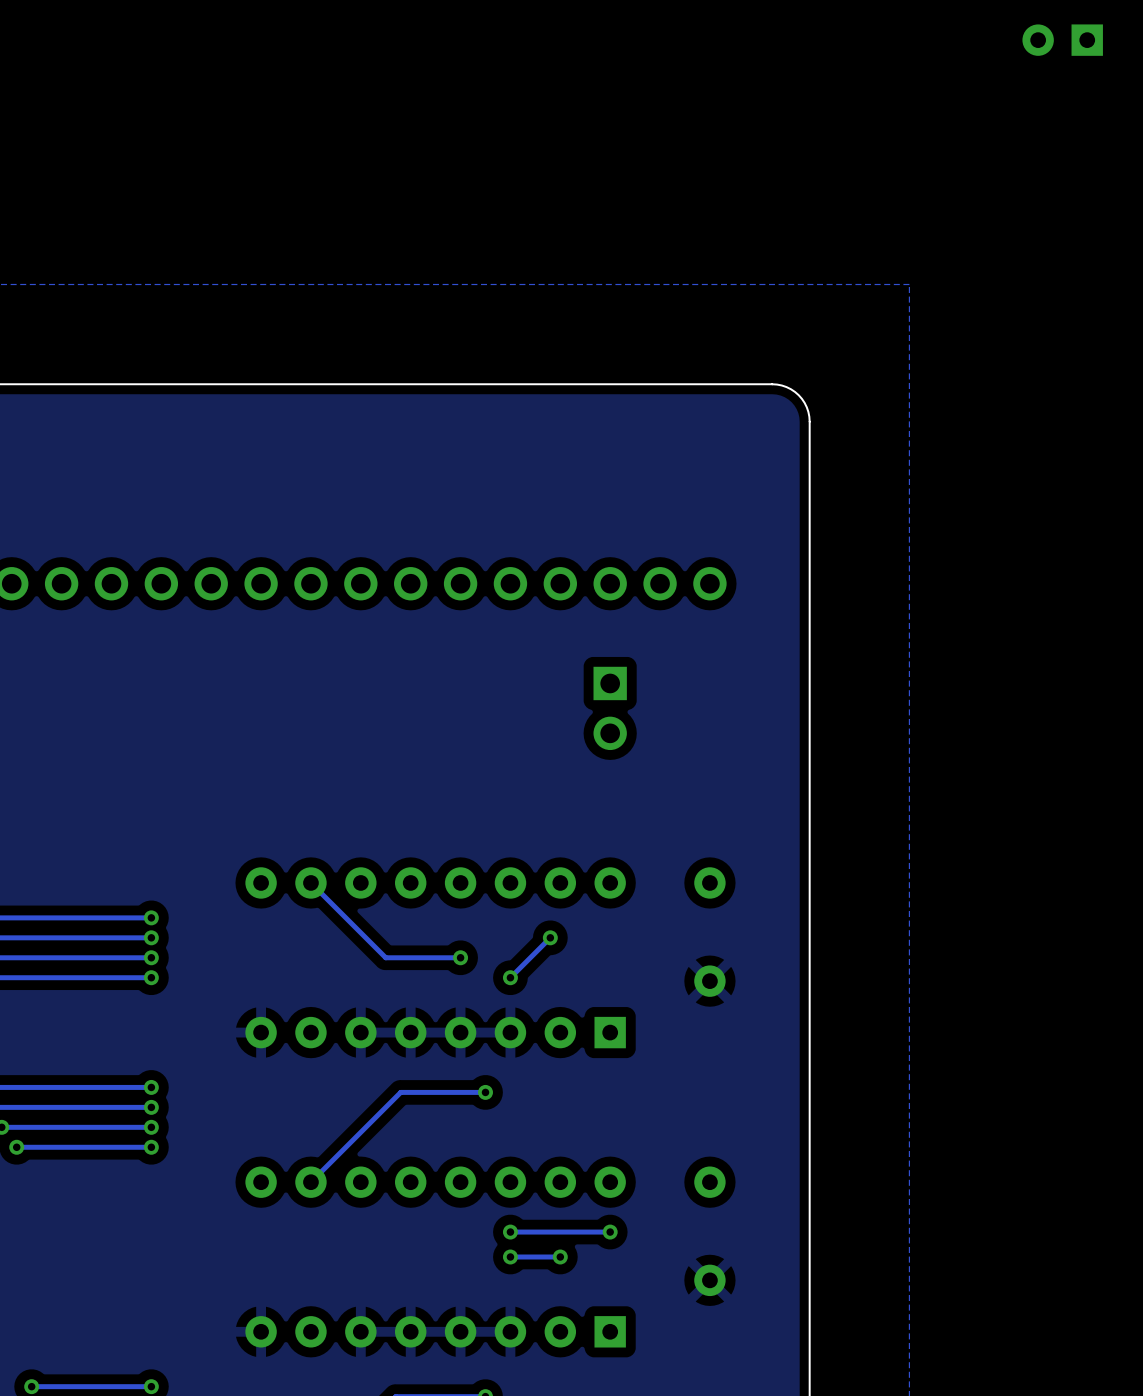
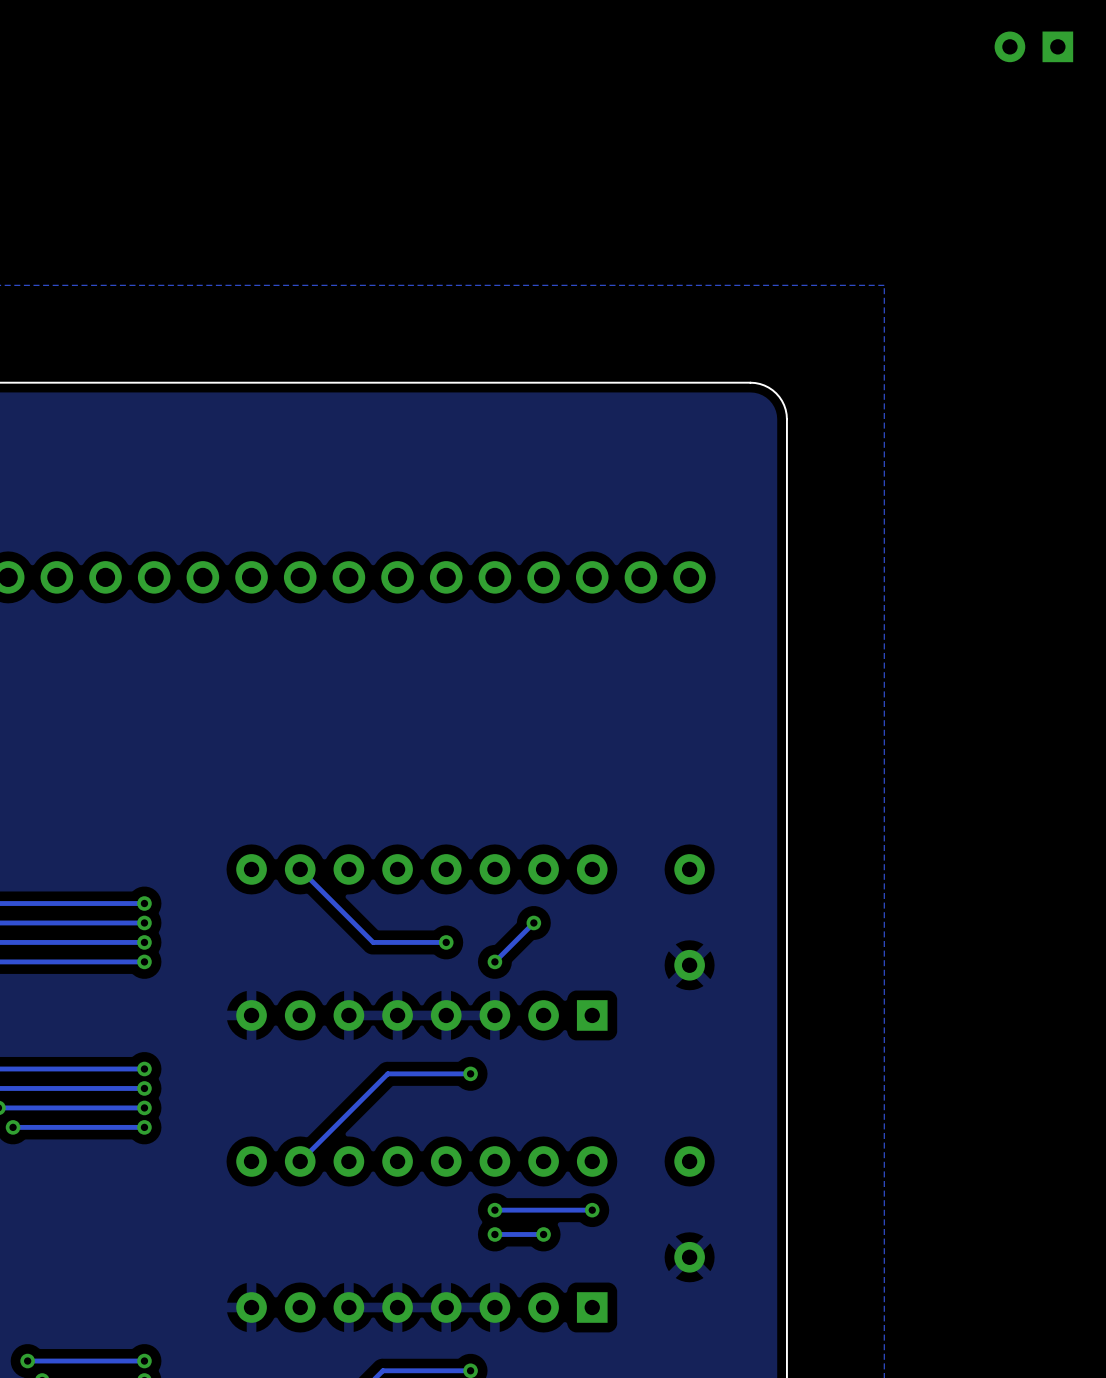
part: (610, 708) -> none

